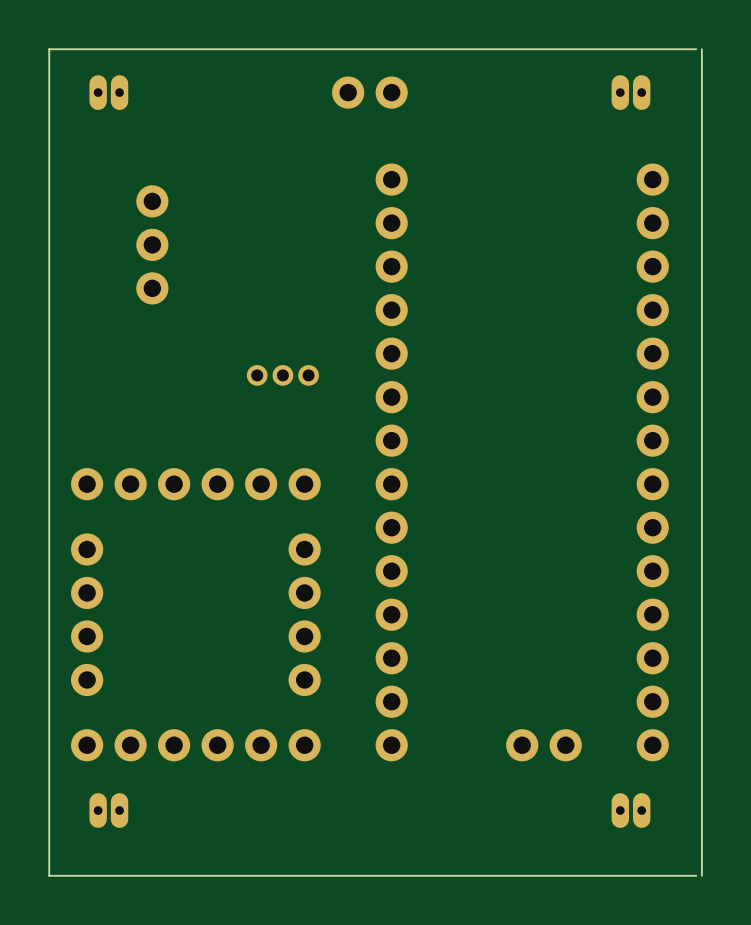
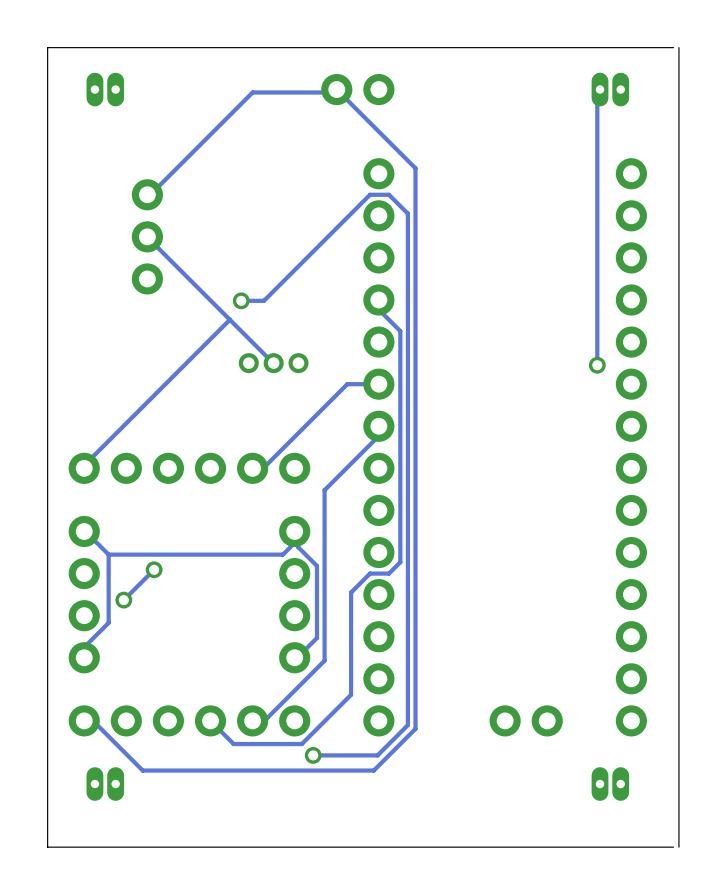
track: none -> (600, 89) (597, 92) (597, 365)
track: none -> (147, 194) (150, 194) (252, 92) (335, 92) (336, 89) (415, 168) (415, 728) (373, 770) (142, 770) (93, 721) (85, 721)
track: none -> (147, 236) (273, 363)
track: none -> (378, 300) (381, 300) (381, 312) (400, 331) (400, 562) (388, 573) (370, 573) (351, 592) (351, 694) (301, 744) (233, 744) (210, 720)
track: none -> (241, 300) (263, 300) (370, 194) (388, 194) (407, 213) (407, 725) (377, 755) (313, 755)
via: none -> (241, 300)
track: none -> (229, 319) (82, 467) (84, 468)
via: none -> (597, 365)
track: none -> (378, 384) (347, 384) (263, 467) (252, 467)
track: none -> (378, 426) (377, 437) (324, 490) (324, 660) (267, 717) (252, 717) (252, 720)
track: none -> (84, 531) (108, 554)
track: none -> (108, 554) (108, 622) (85, 645) (85, 656) (84, 657)
track: none -> (108, 554) (282, 554) (298, 539) (294, 531) (298, 531) (298, 547) (317, 566) (317, 637) (298, 656) (294, 657)
track: none -> (154, 569) (123, 600)
via: none -> (154, 569)
via: none -> (123, 600)
via: none -> (313, 755)

